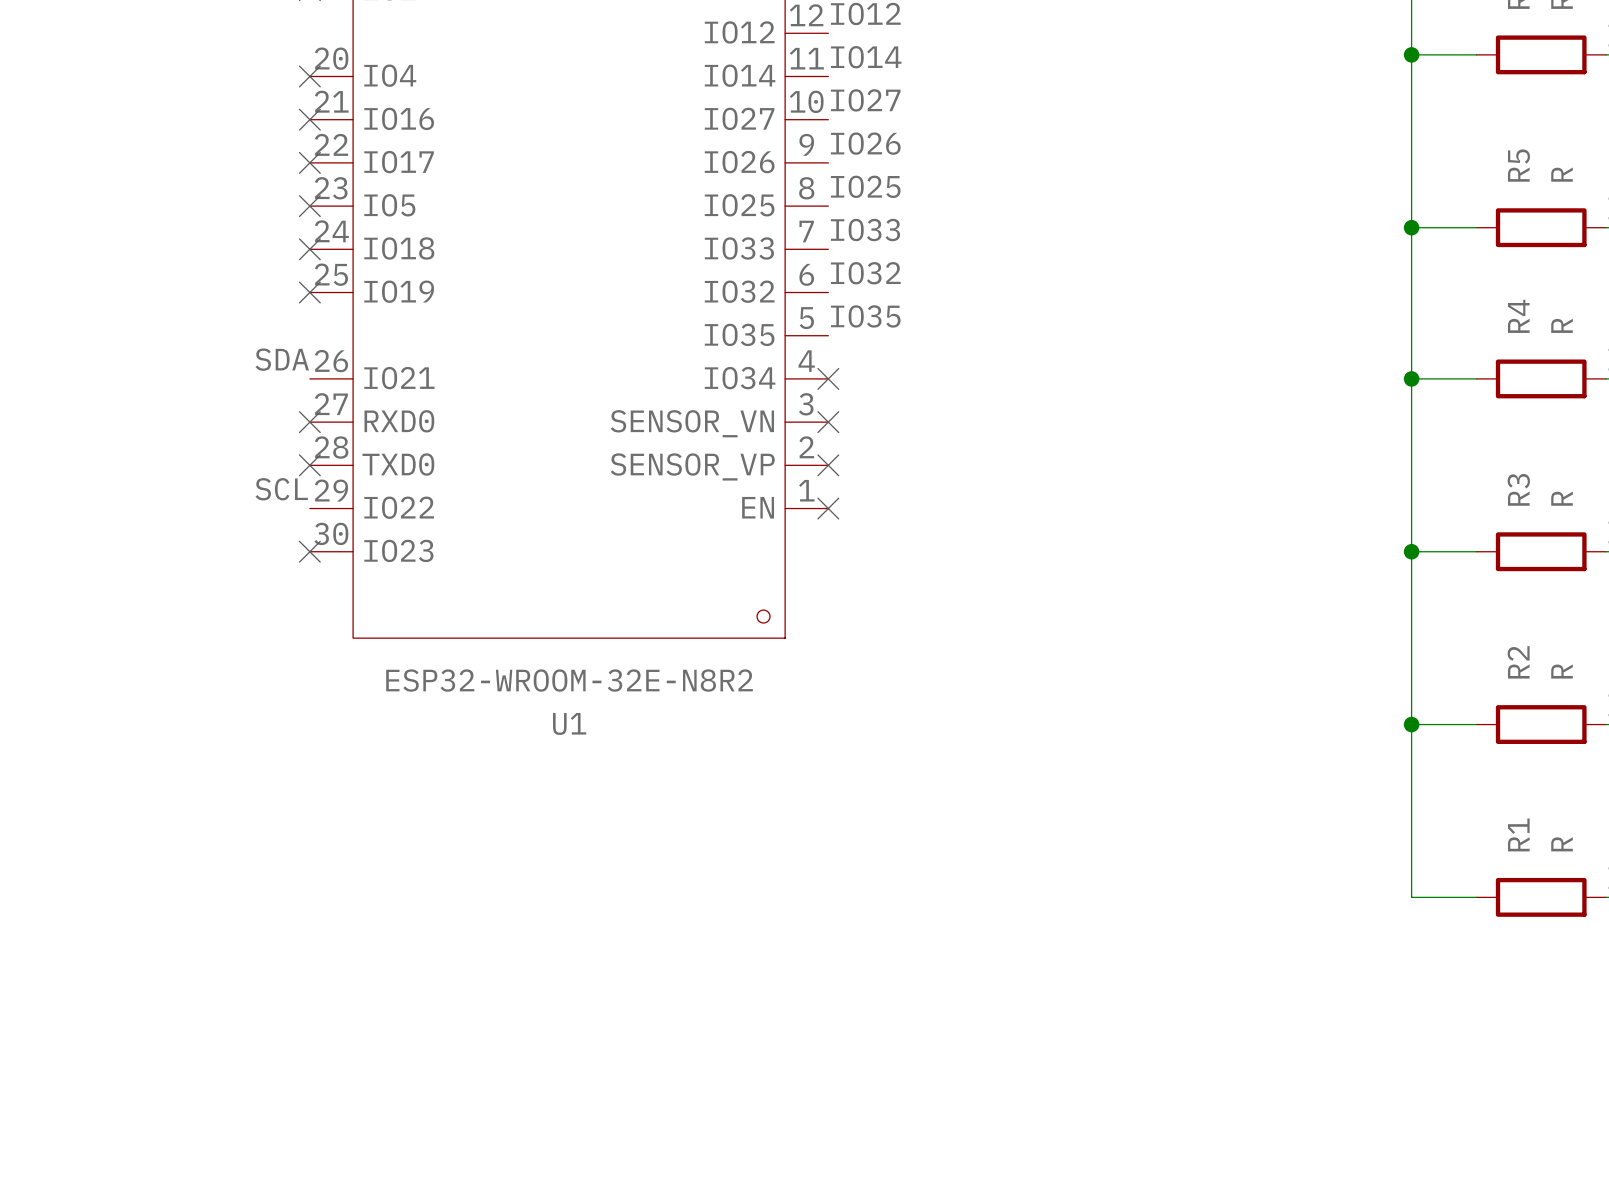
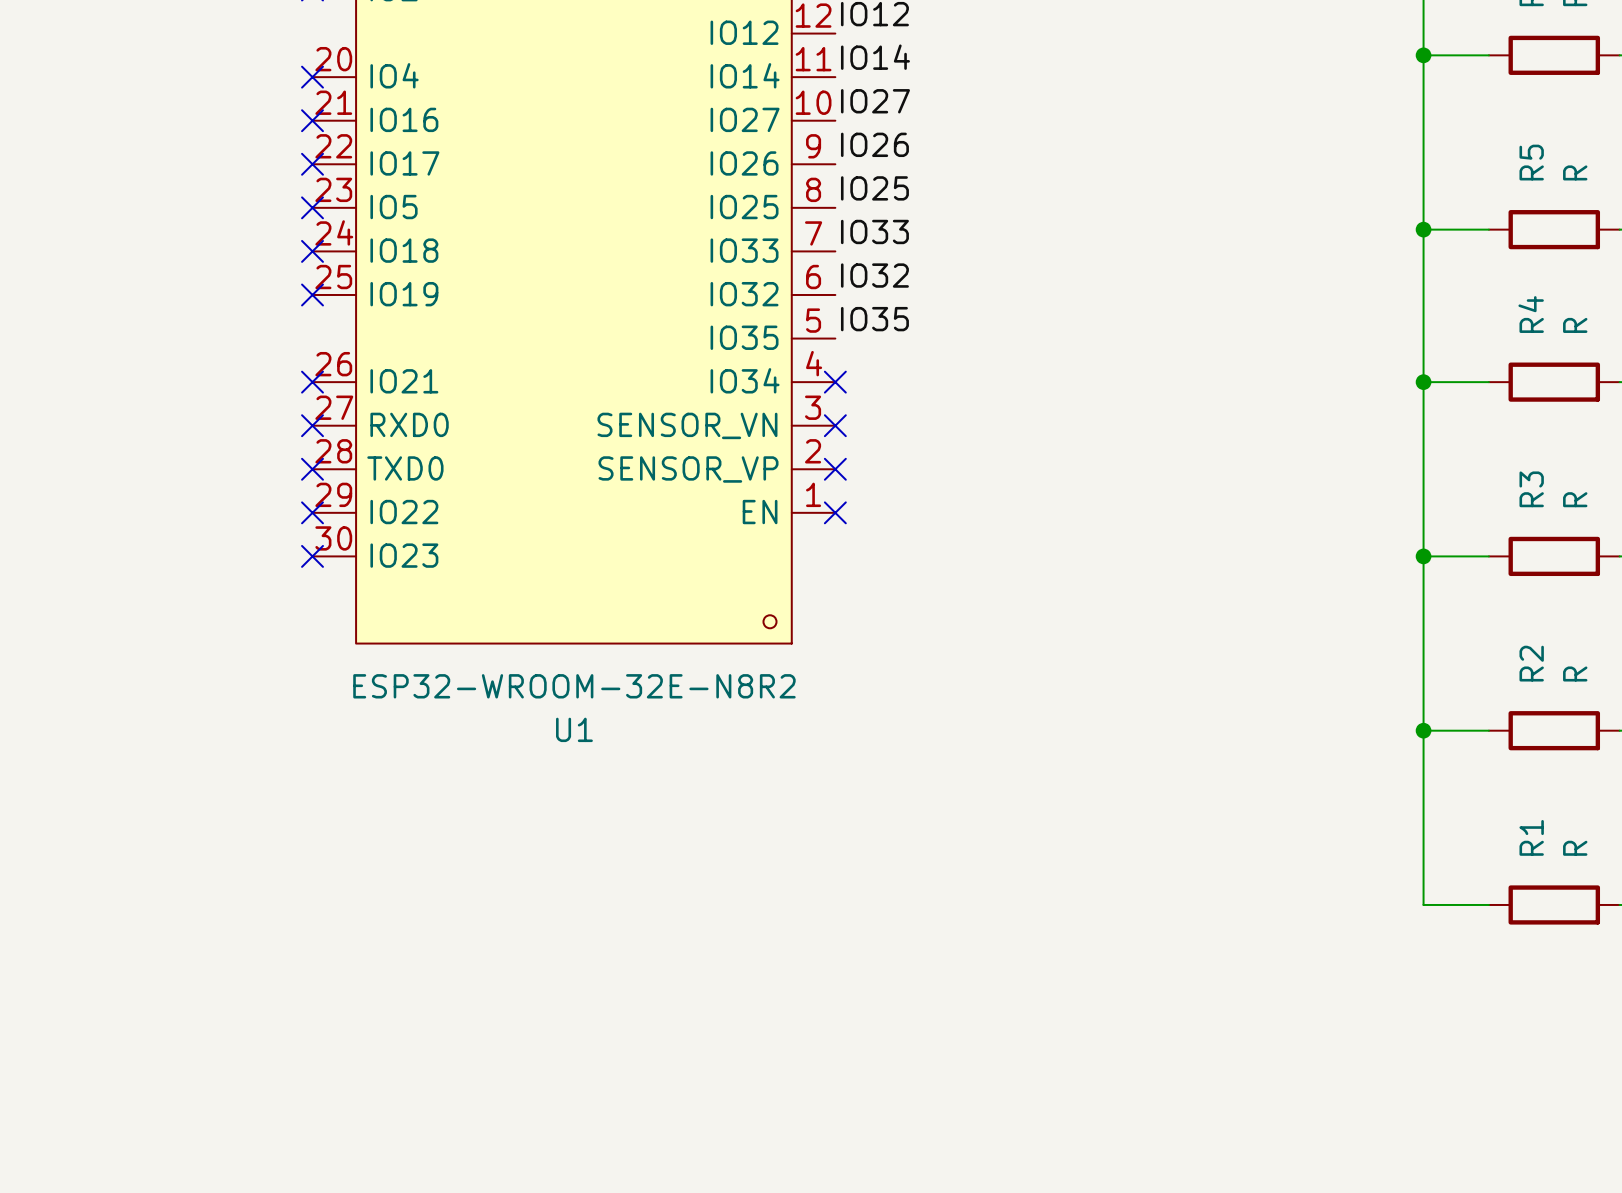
label: SDA (282, 359) -> none
no-connect mark: none -> (312, 382)
label: SCL (281, 489) -> none
no-connect mark: none -> (312, 512)

